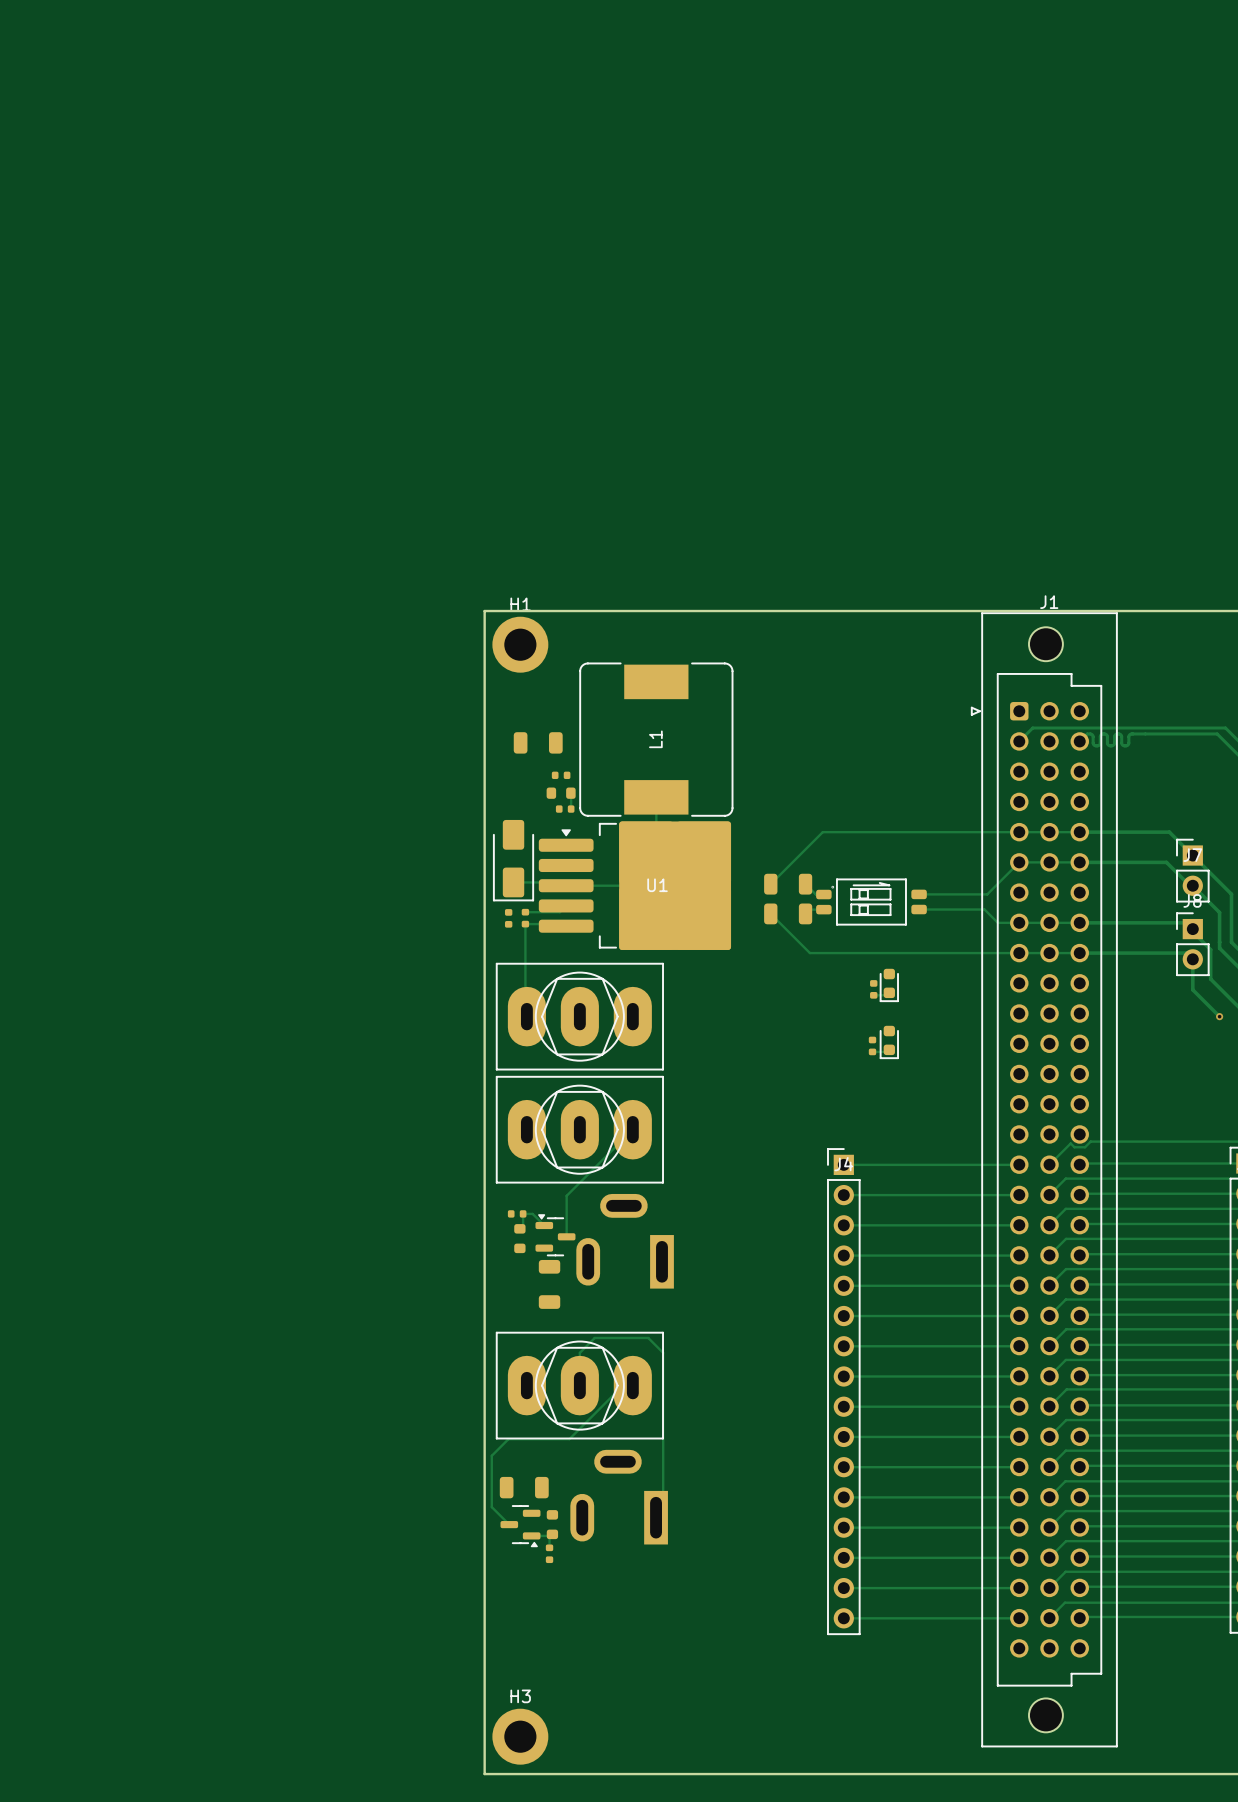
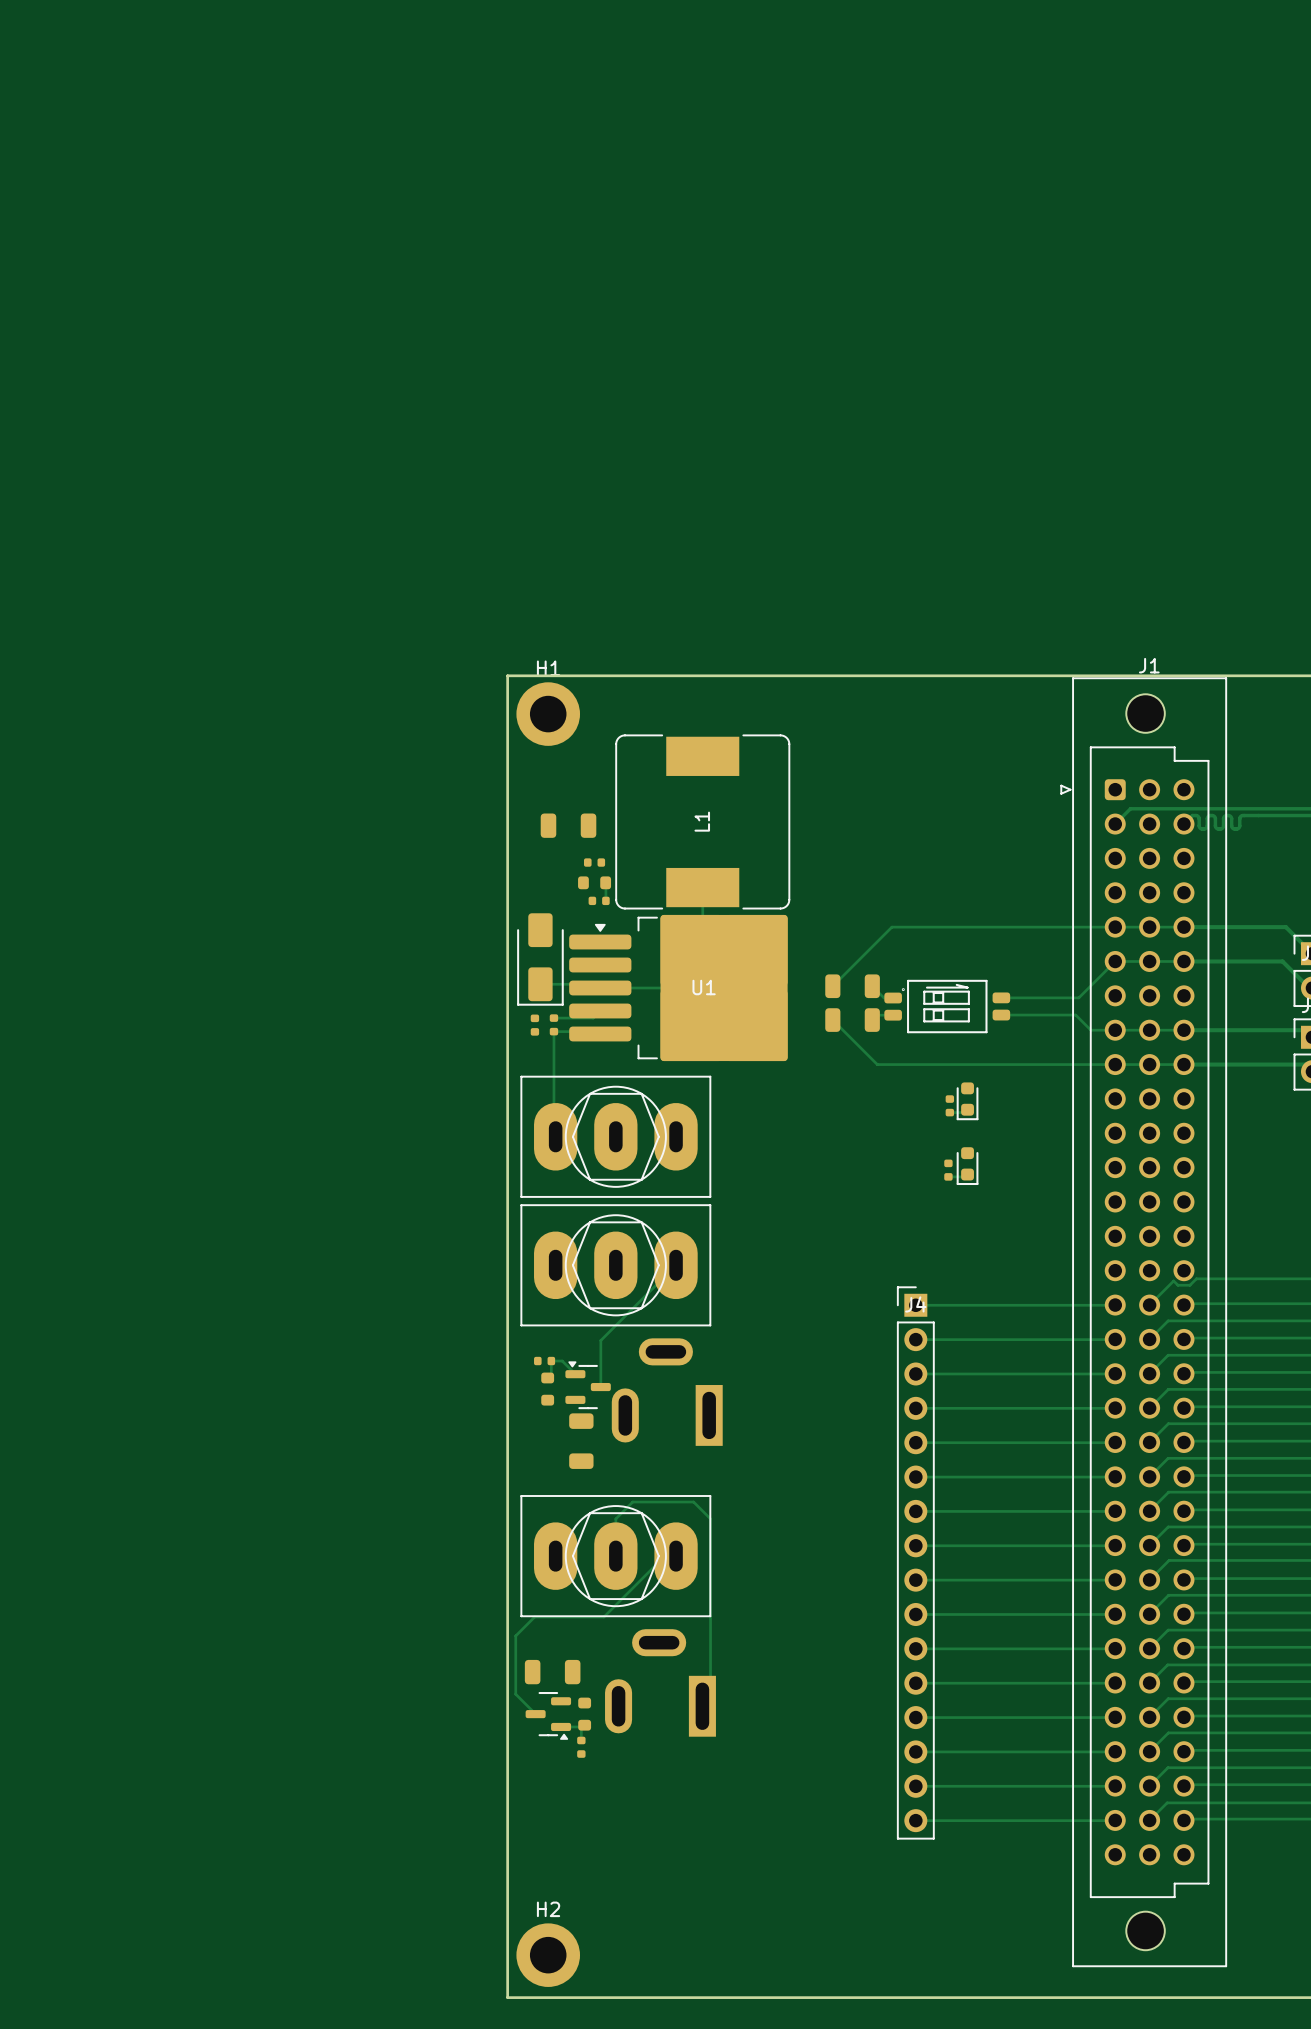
H3 name: H3 (520, 1696) -> H2 (548, 1909)

